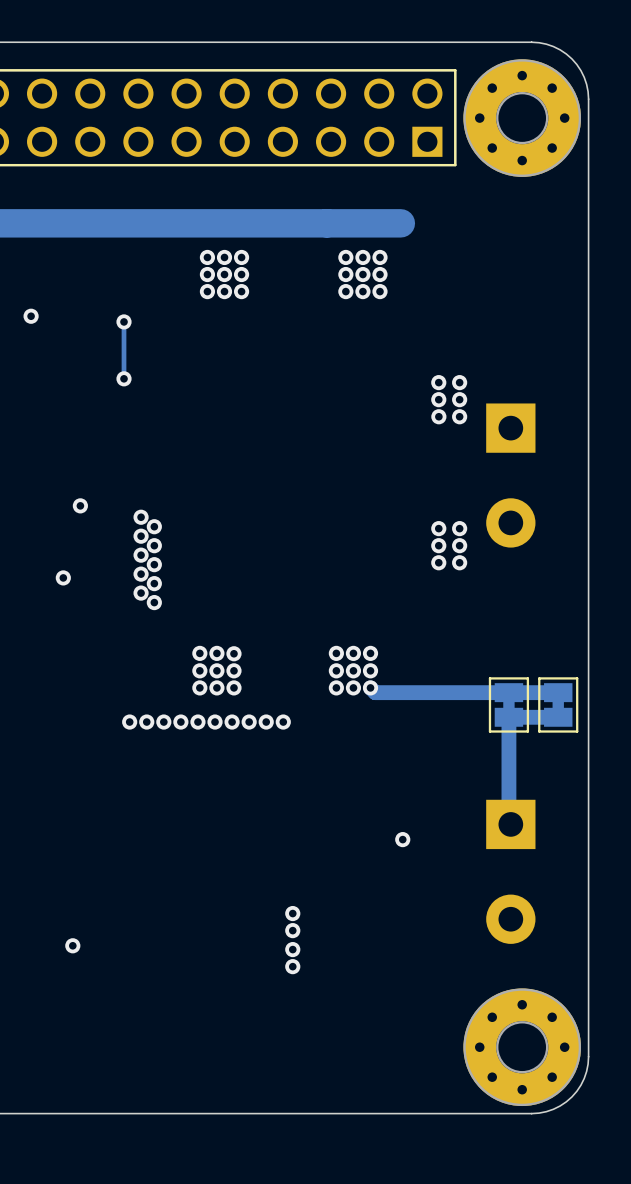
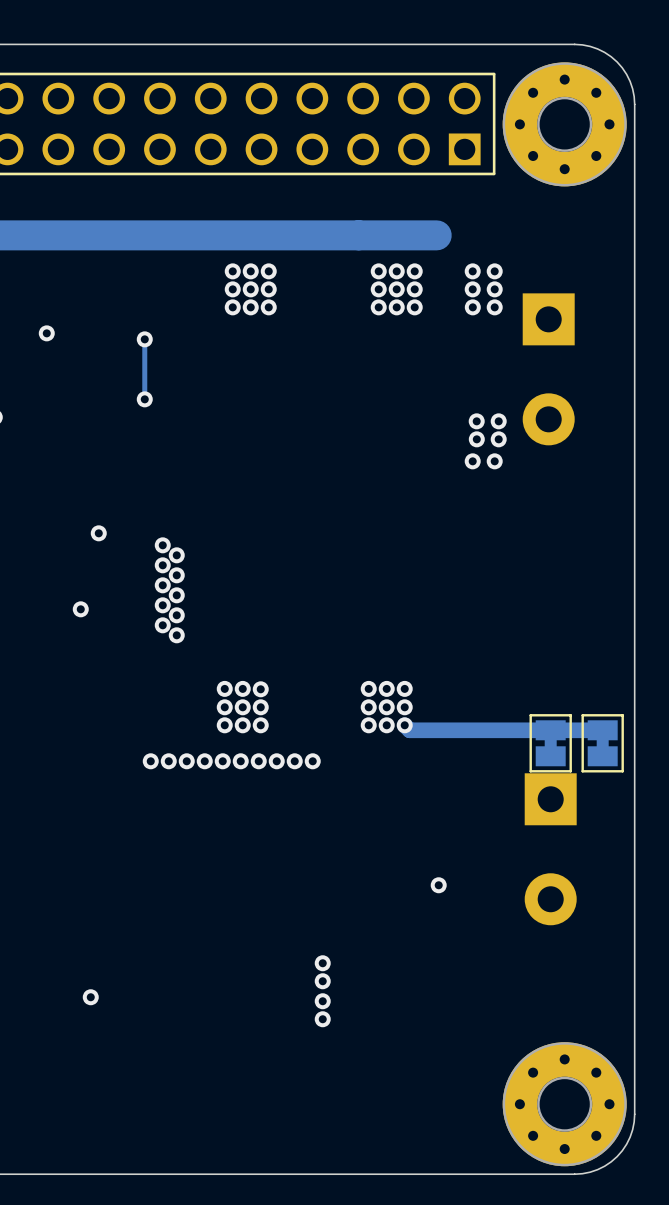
via: none -> (472, 271)
via: none -> (494, 271)
via: none -> (472, 289)
via: none -> (494, 289)
via: none -> (472, 307)
via: none -> (494, 307)
via: (438, 382) -> none
via: (459, 382) -> none
via: none -> (472, 461)
via: none -> (494, 461)
part position: (510, 475) -> (548, 369)
via: (438, 528) -> none
via: (459, 528) -> none
via: (438, 545) -> none
via: (459, 545) -> none
via: (438, 562) -> none
via: (459, 562) -> none
track: (558, 717) (508, 717) (508, 822) (510, 824) -> none
part position: (510, 871) -> (550, 849)

